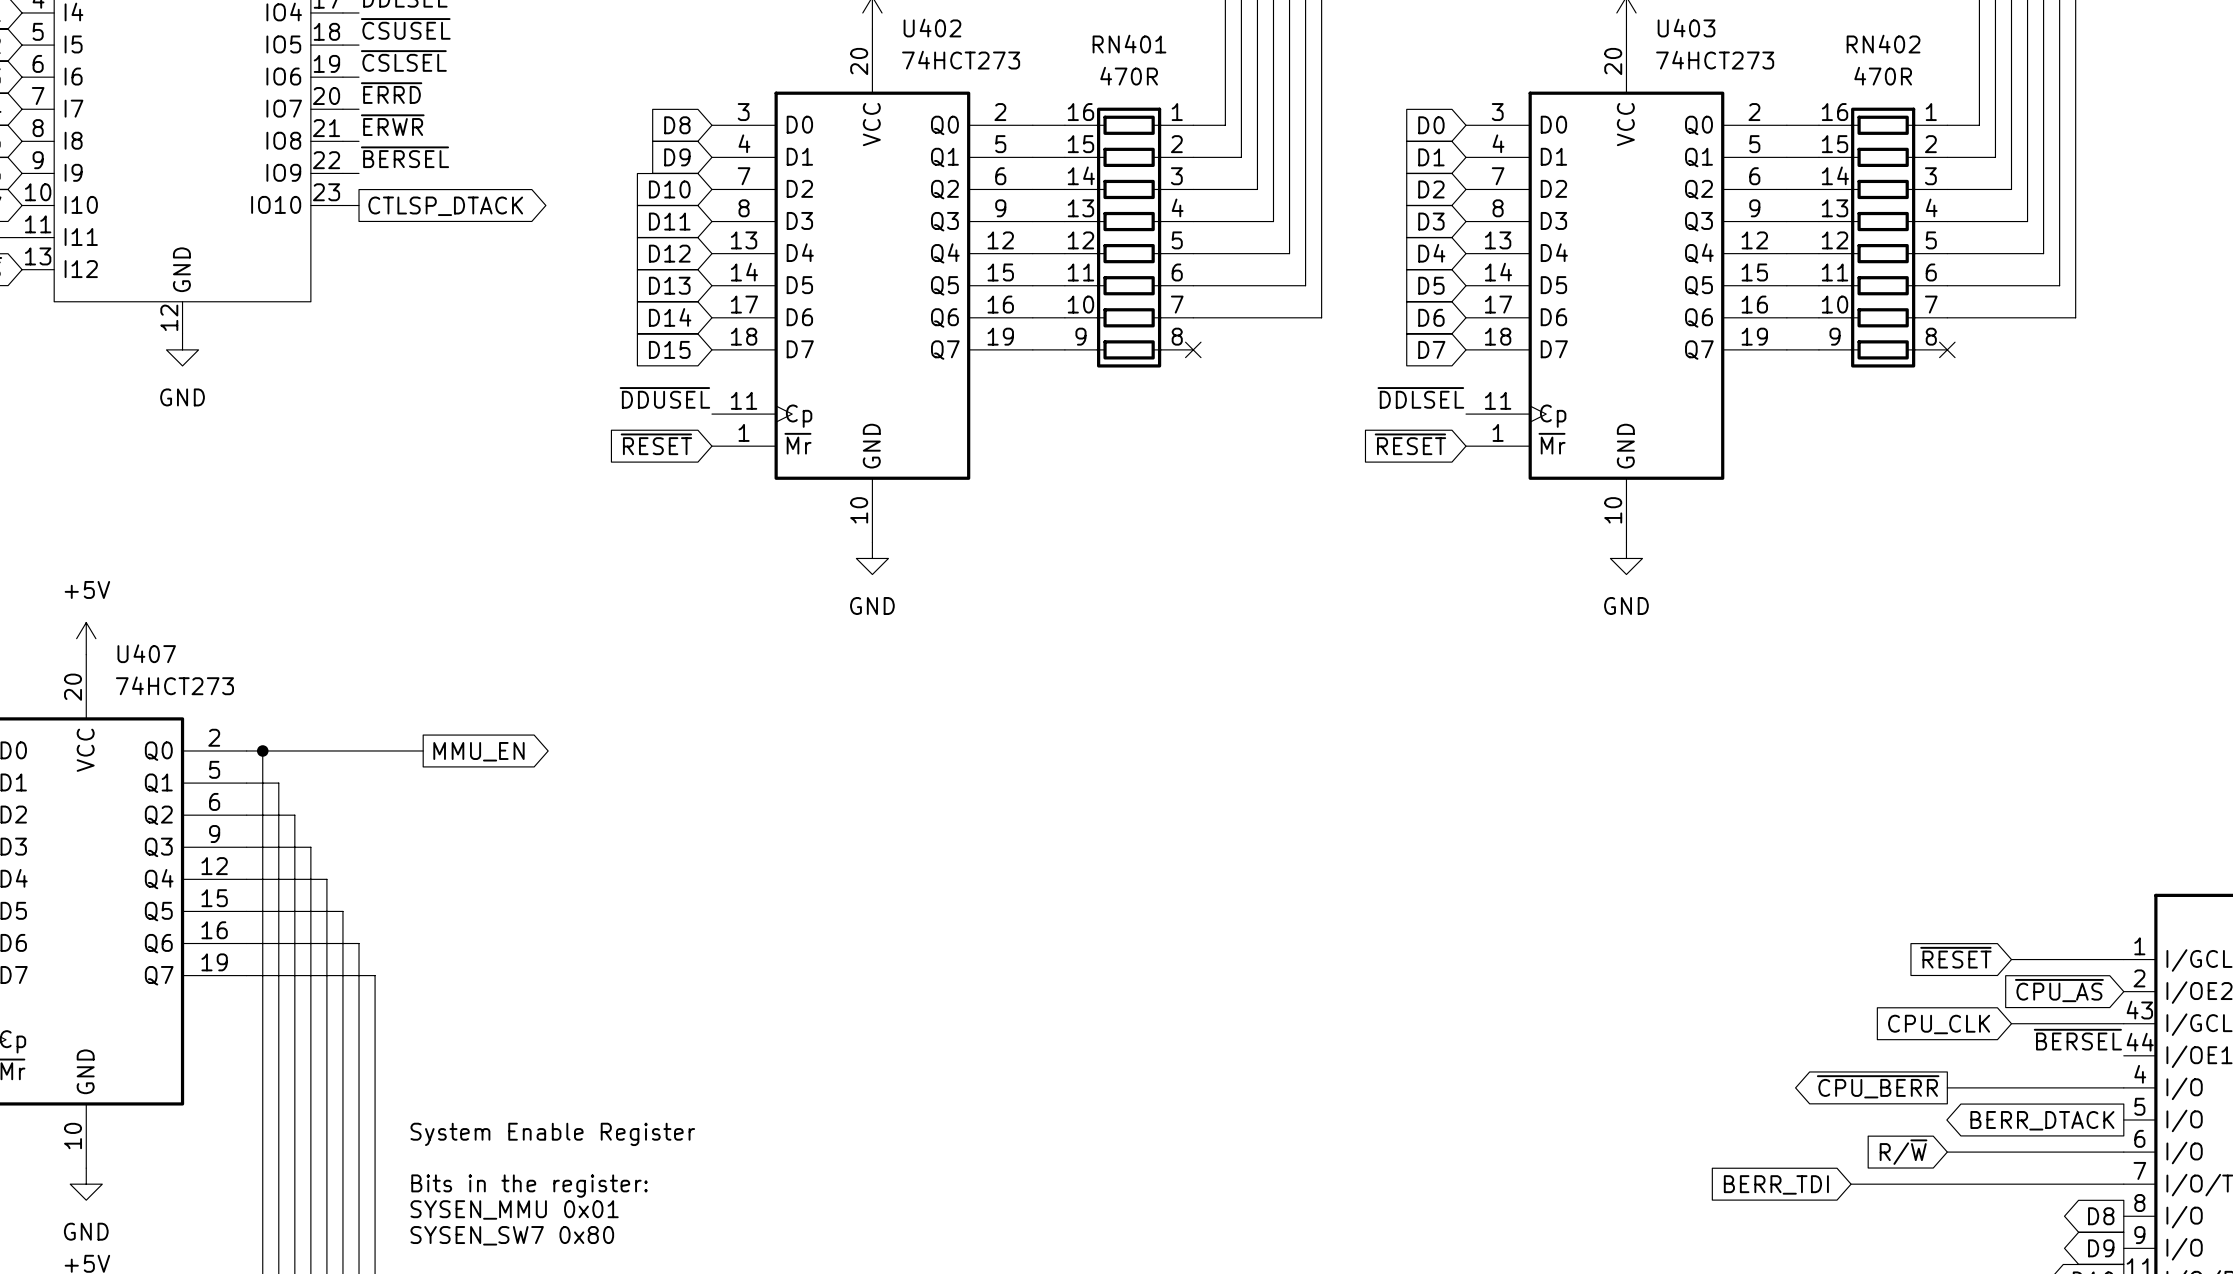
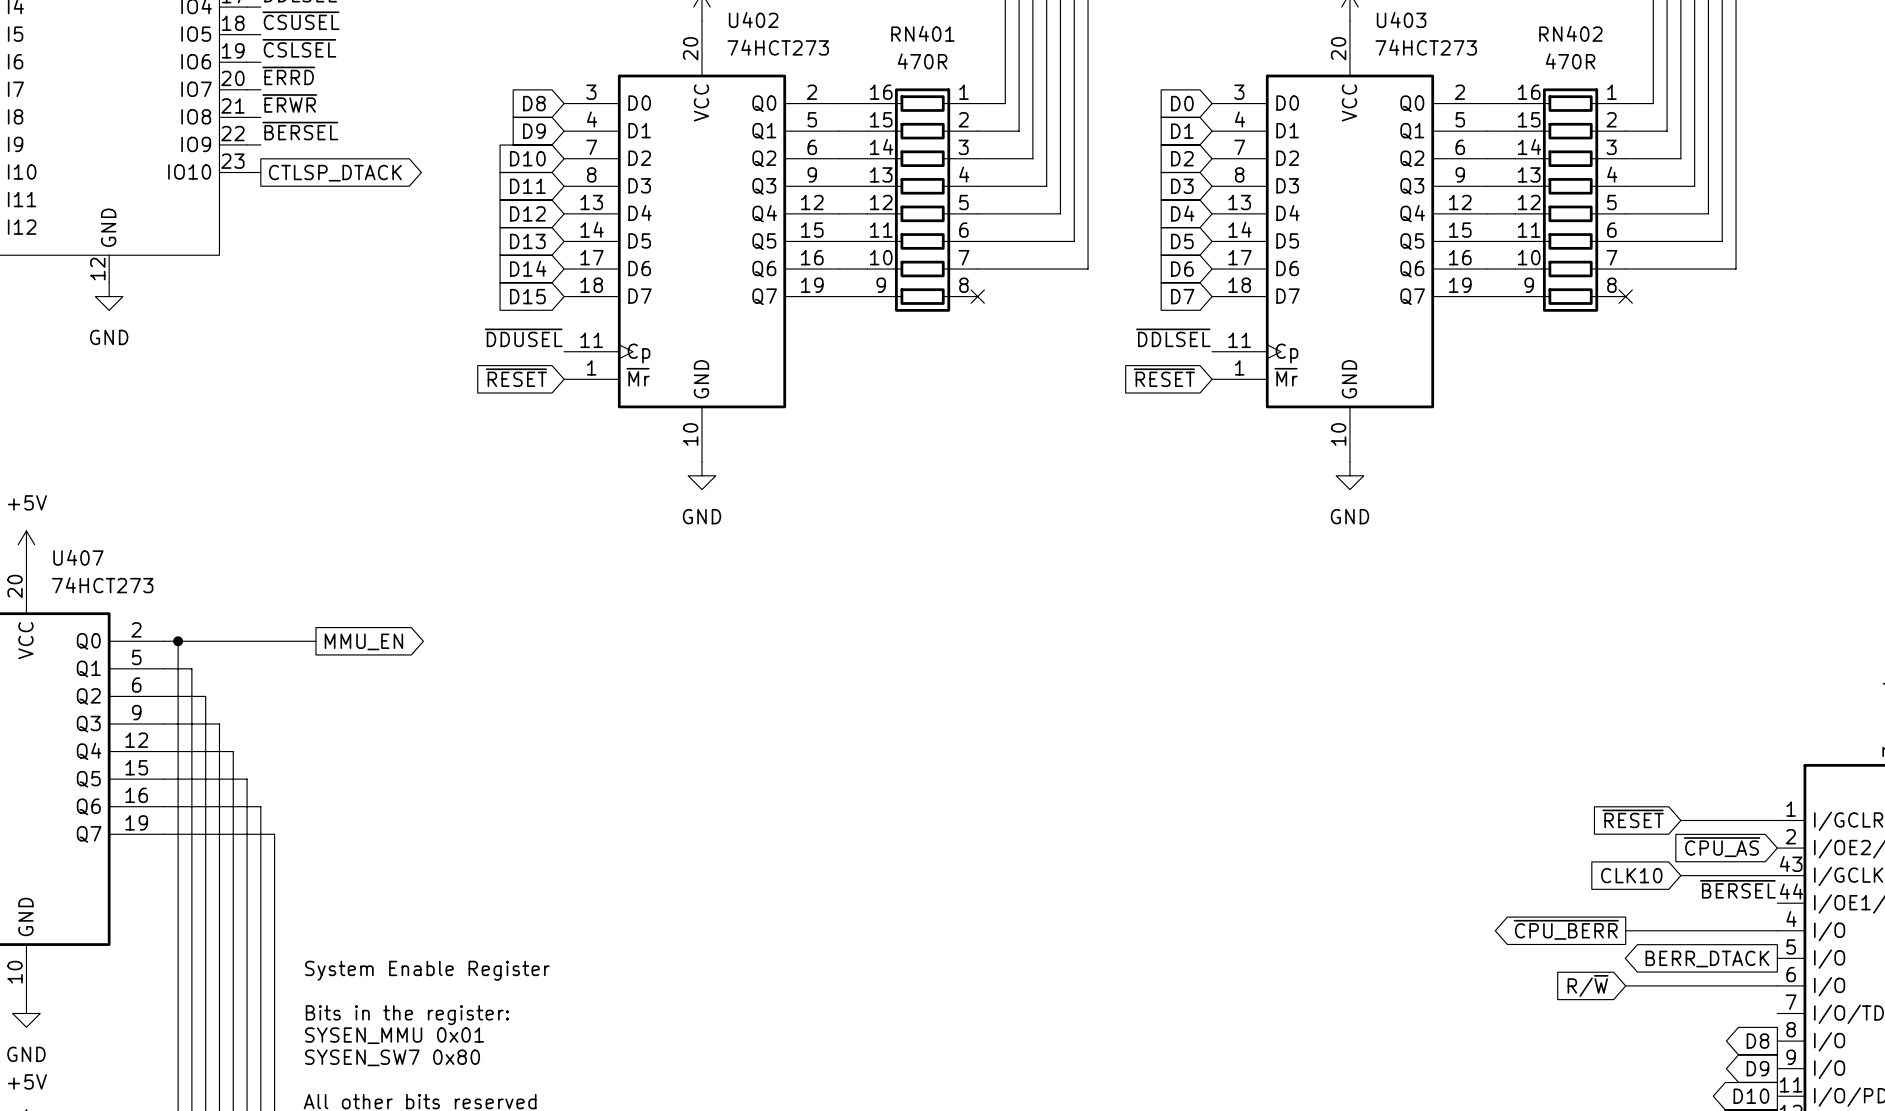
global label: CPU_CLK (1939, 1024) -> CLK10 (1631, 875)
global label: BERR_TDI (1776, 1184) -> none
wire: (1851, 1184) (2123, 1184) -> none

